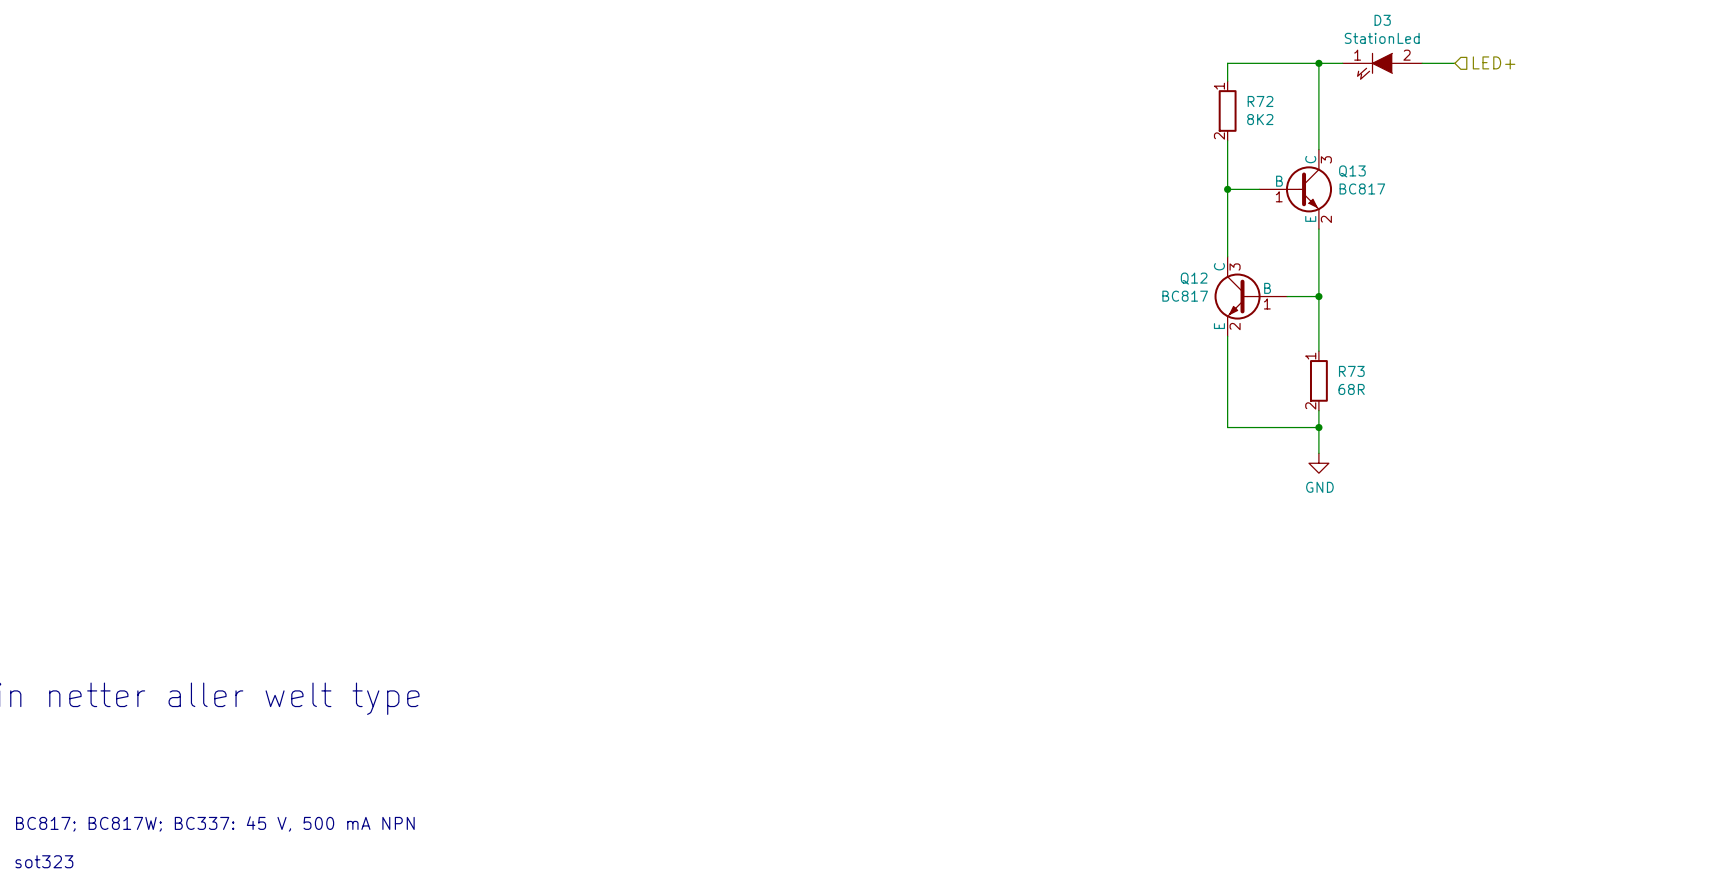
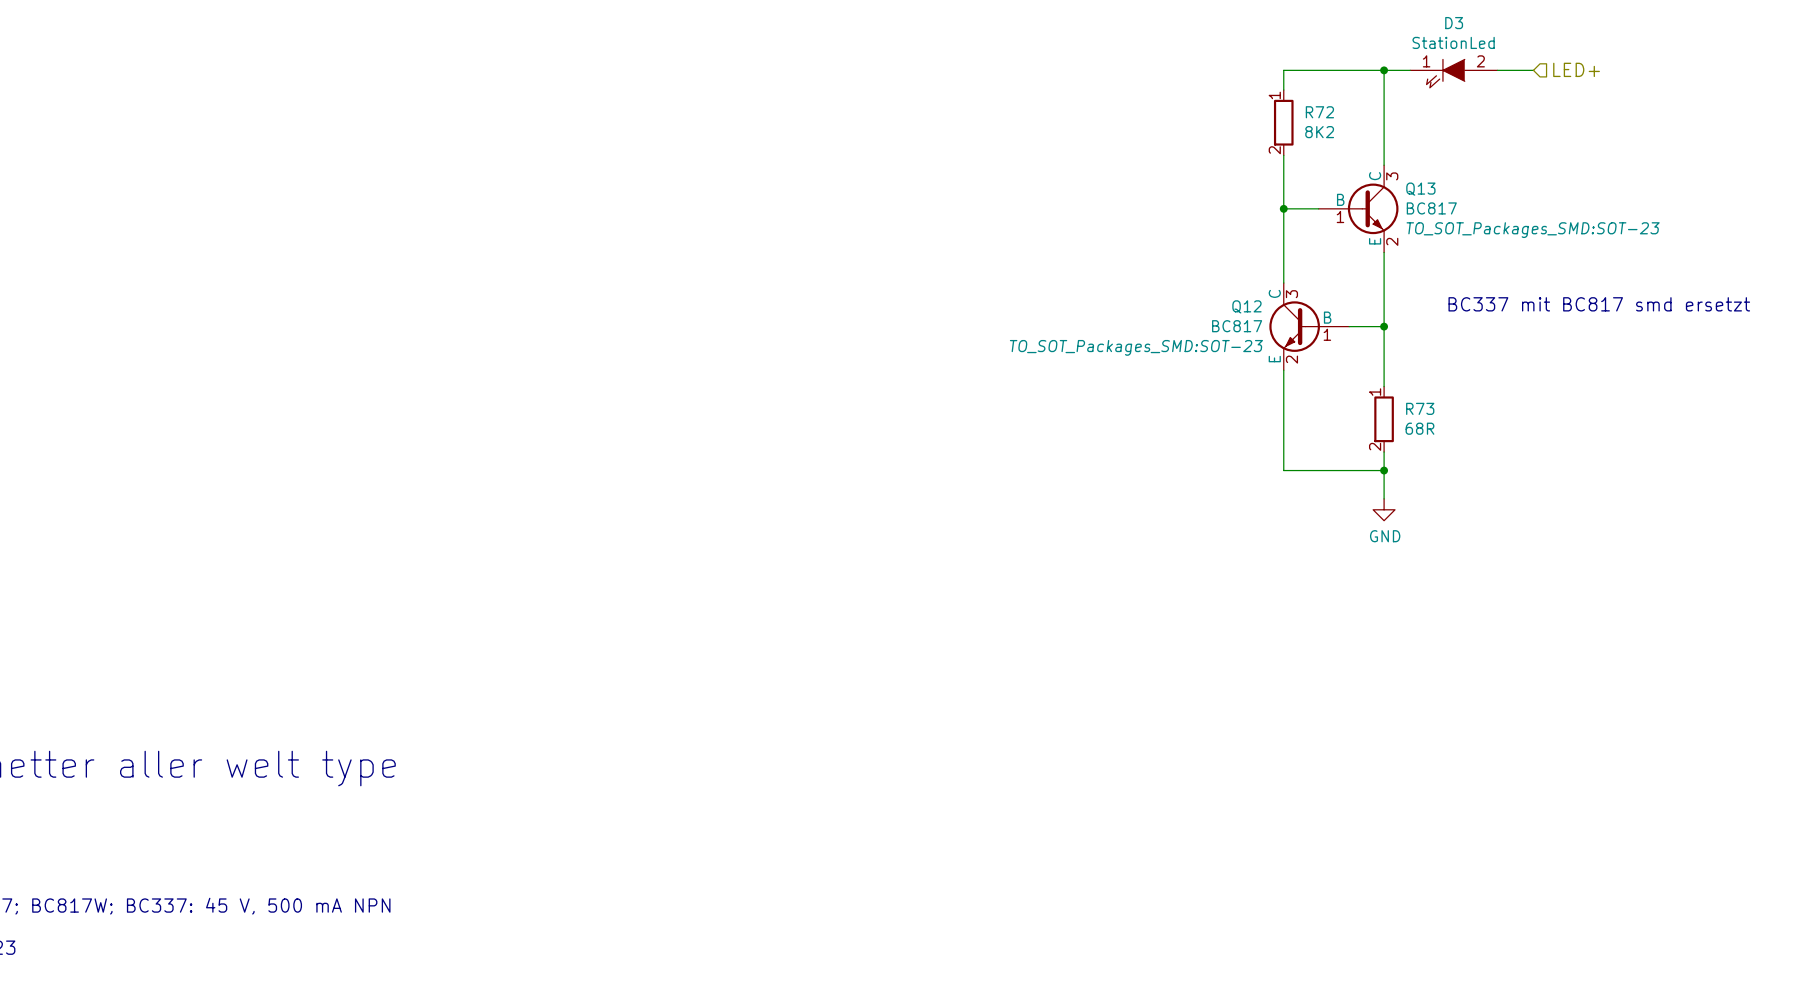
Q13 text: none -> TO_SOT_Packages_SMD:SOT-23 (1533, 230)
text: none -> BC337 mit BC817 smd ersetzt (1599, 304)
Q12 text: none -> TO_SOT_Packages_SMD:SOT-23 (1136, 347)

